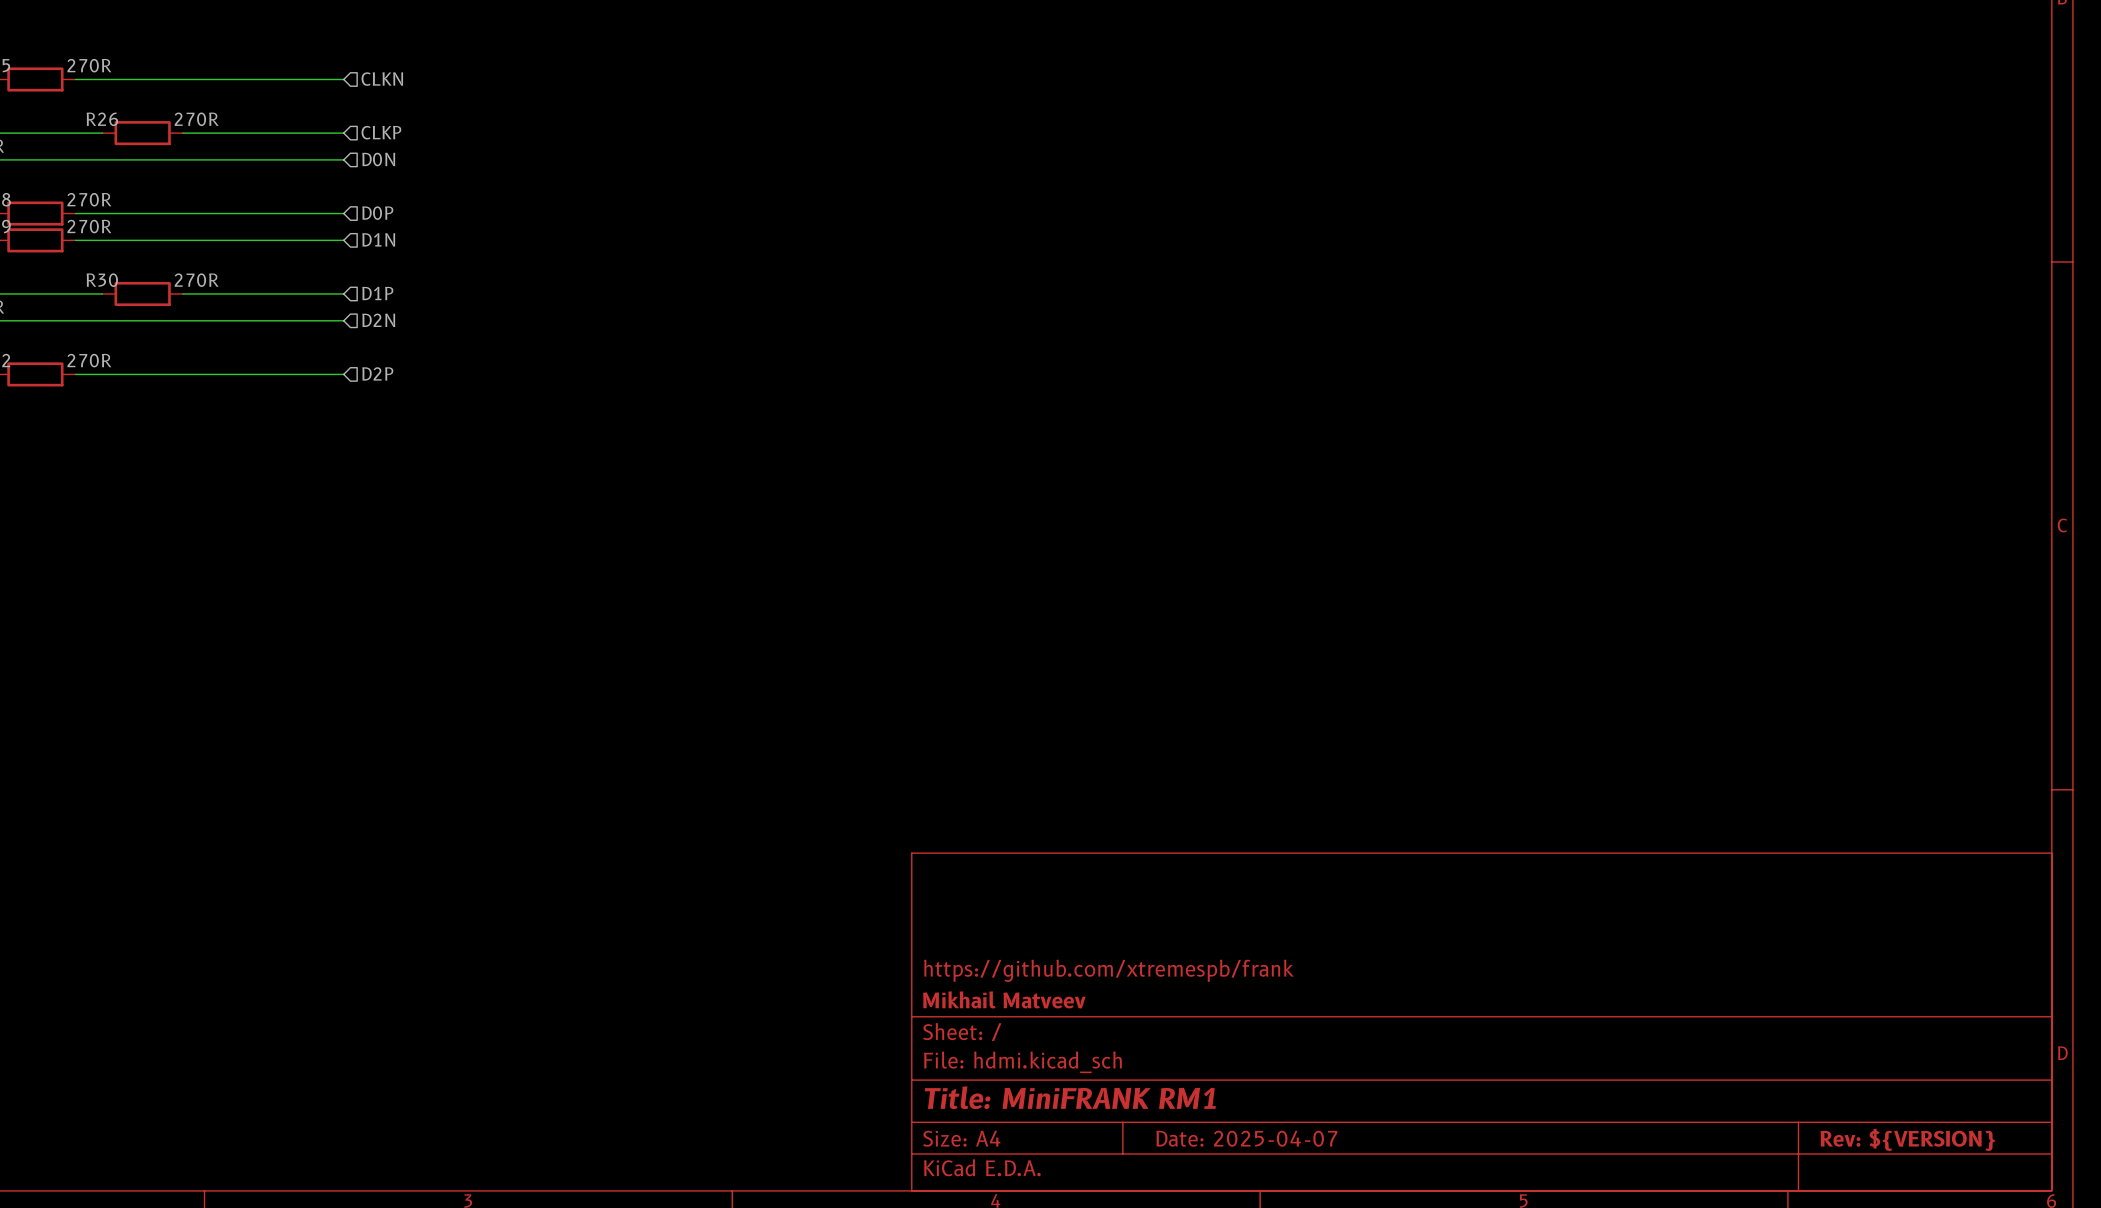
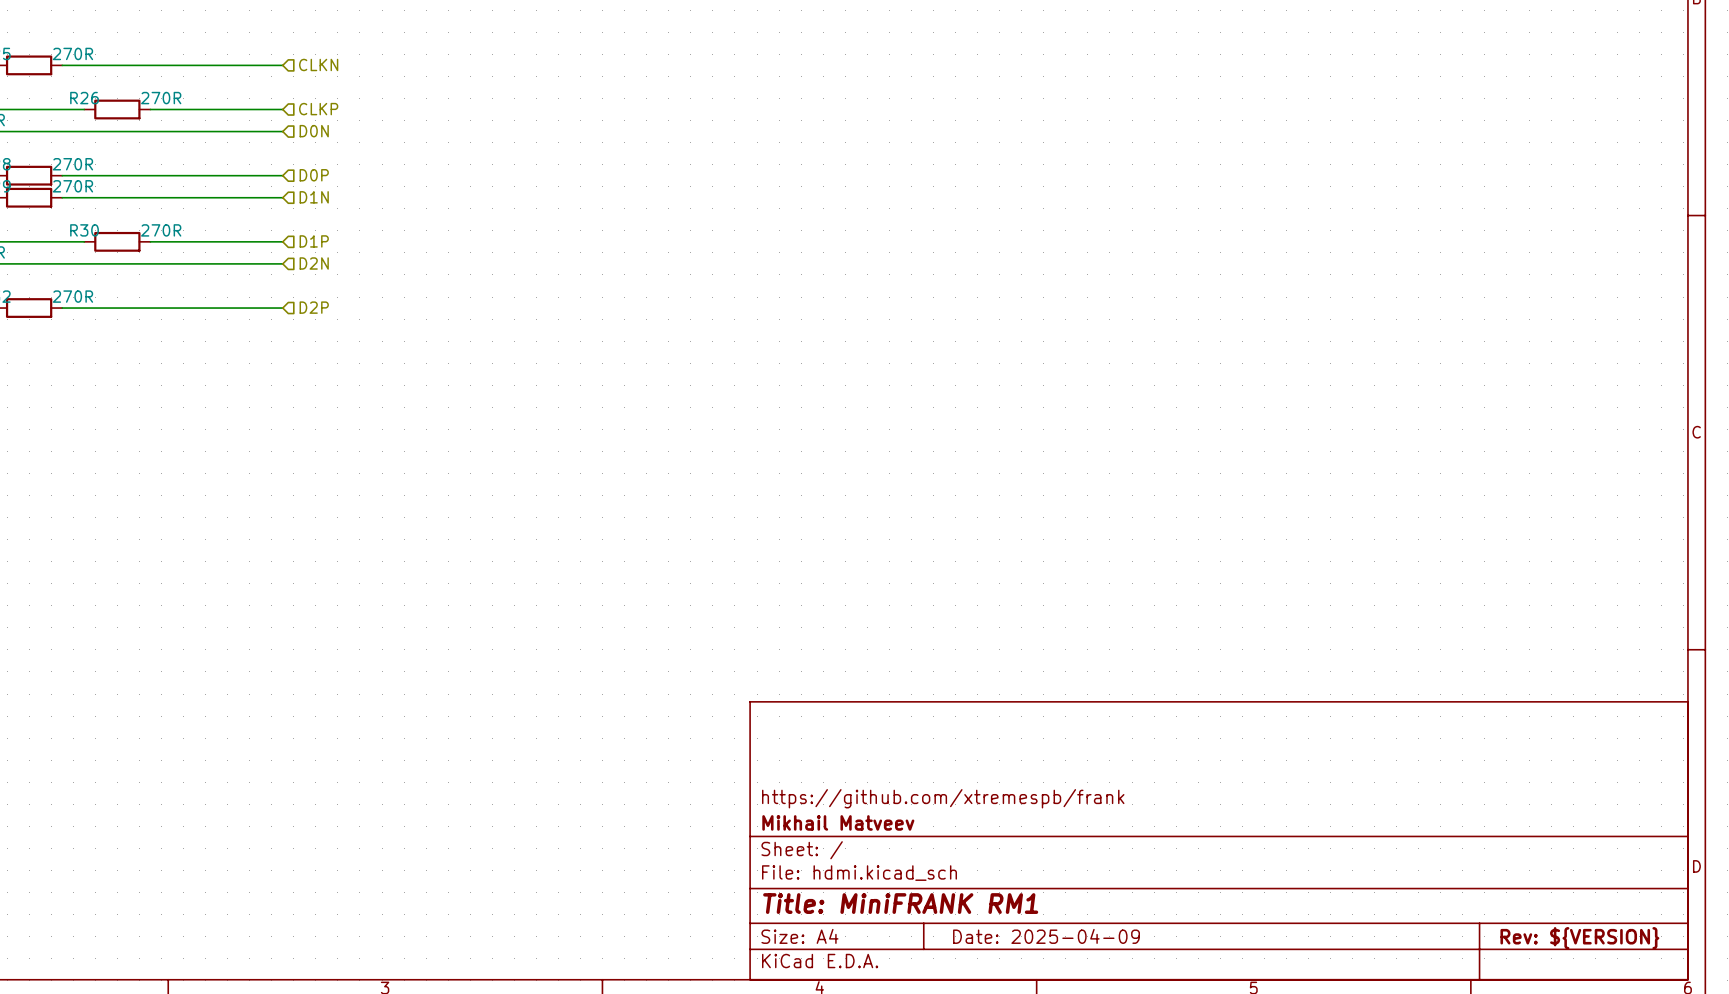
title block: Date: 2025-04-07 (1246, 1138) -> Date: 2025-04-09 (1046, 936)

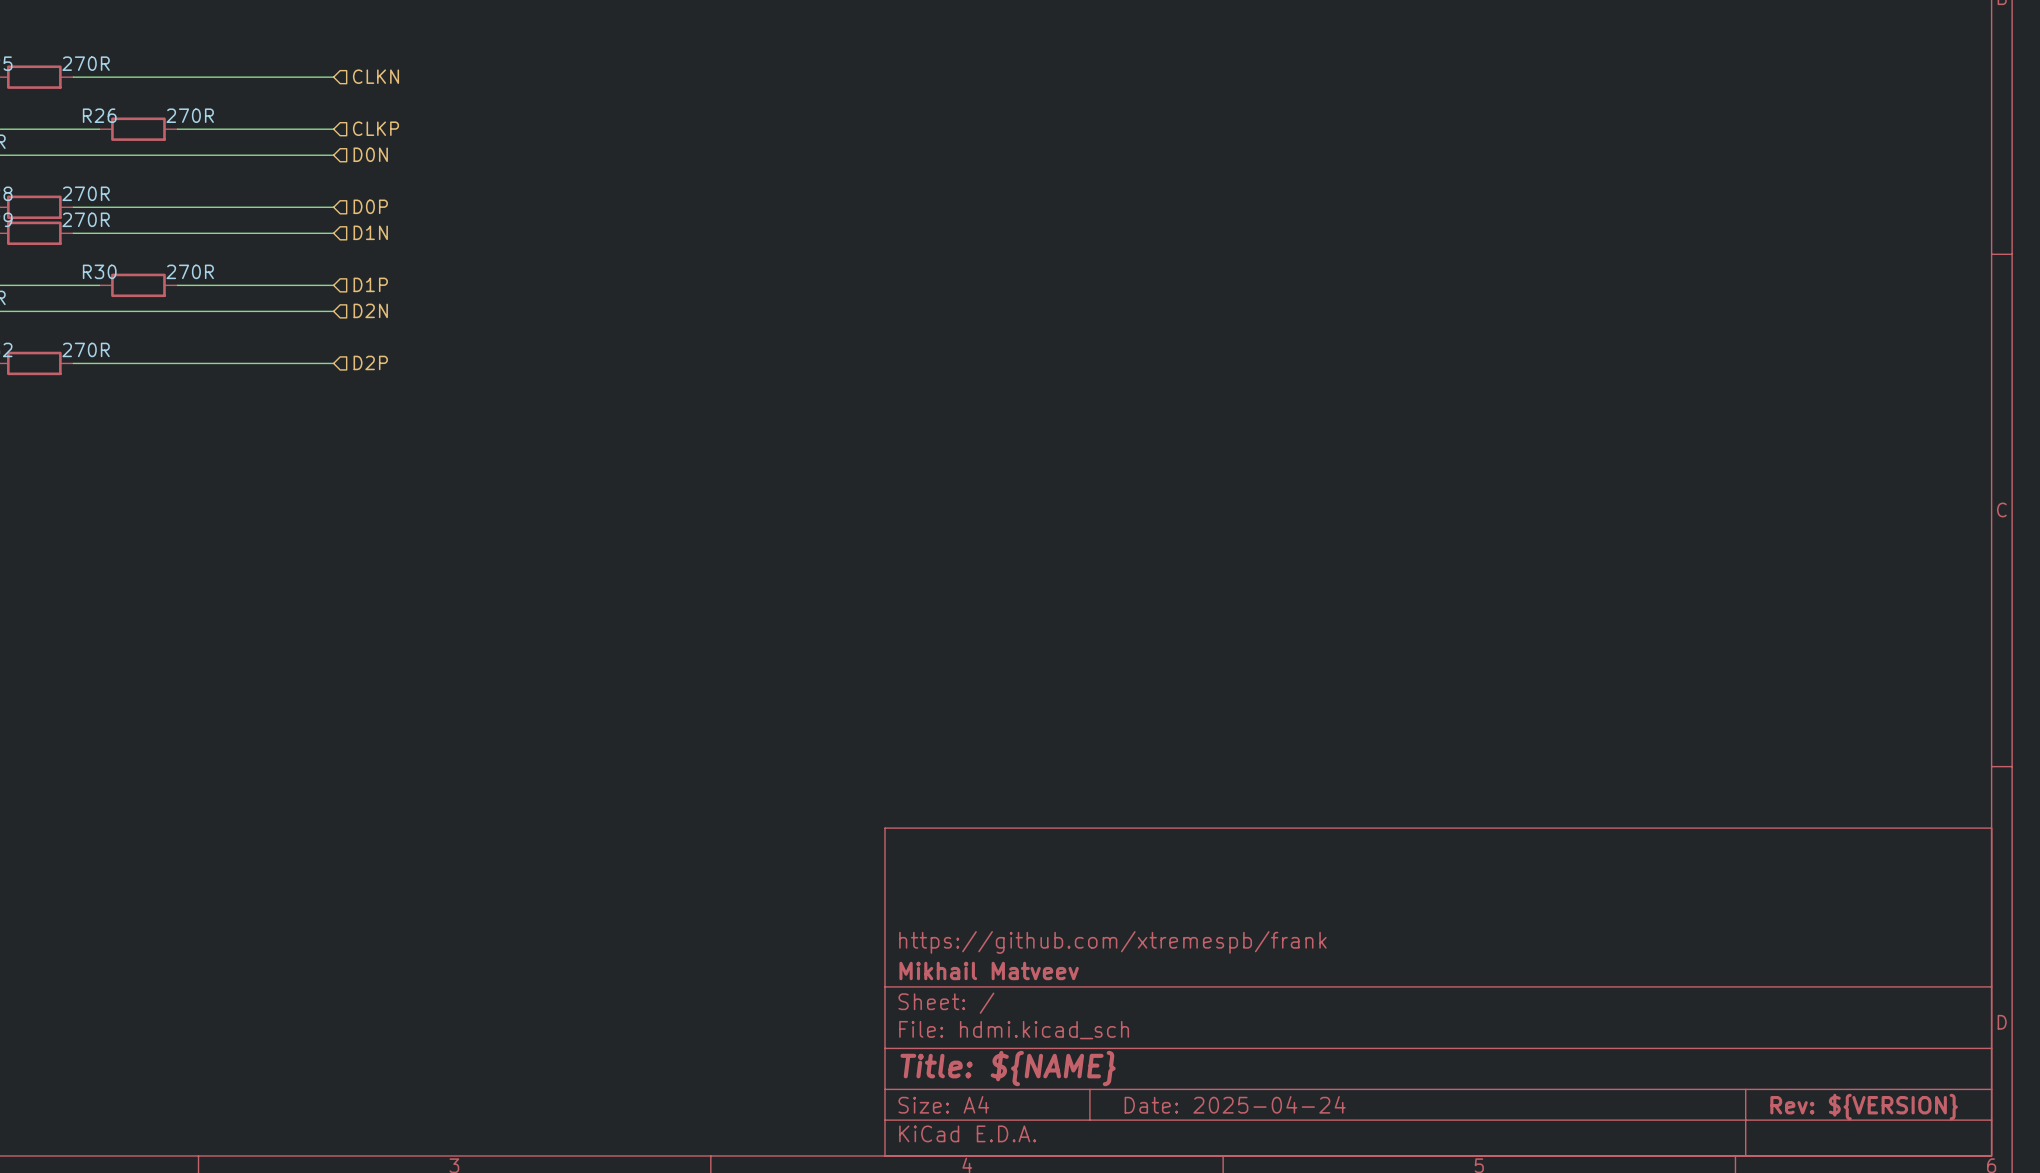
title block: Title: MiniFRANK RM1 (900, 903) -> Title: ${NAME} (1008, 1068)
title block: Date: 2025-04-09 (1046, 936) -> Date: 2025-04-24 (1235, 1104)

